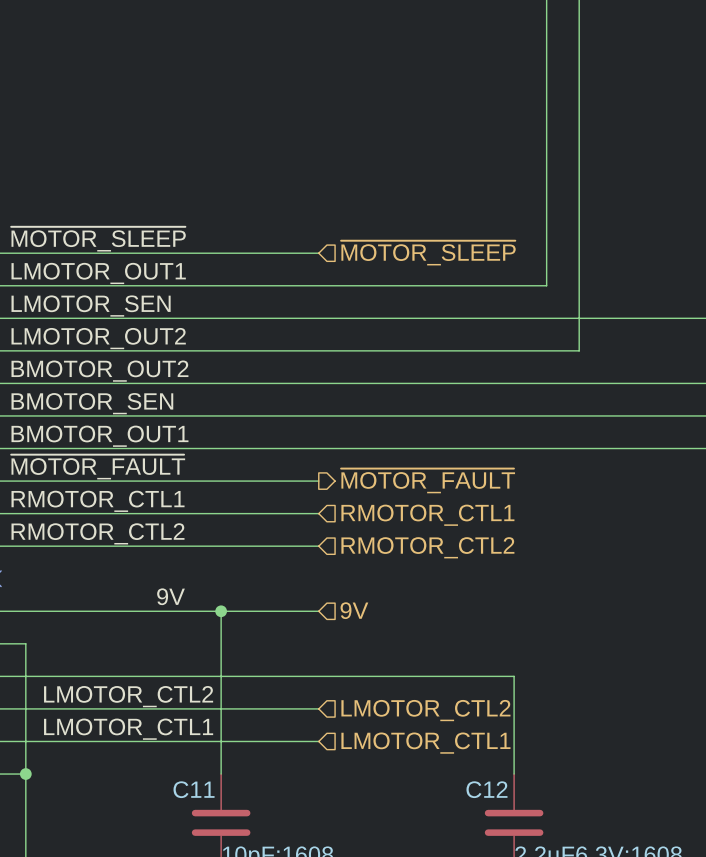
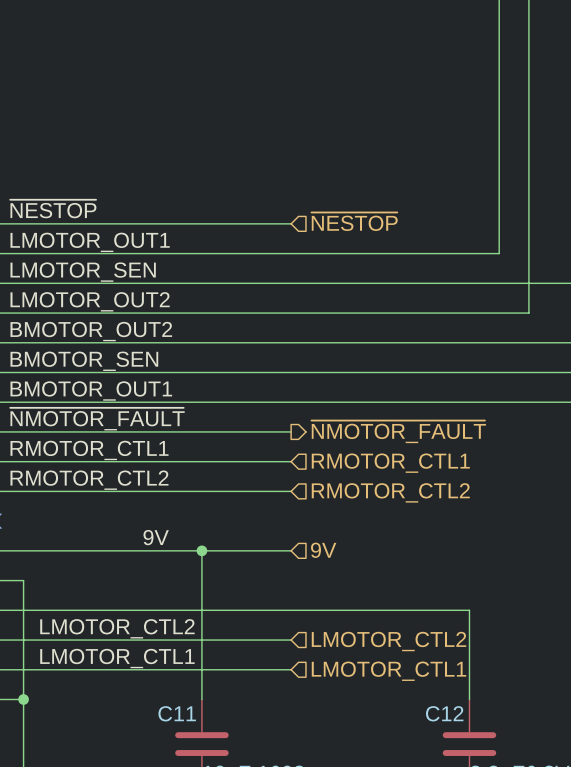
label: ~{MOTOR_SLEEP} (98, 239) -> ~{NESTOP} (53, 209)
hierarchical label: ~{MOTOR_SLEEP} (428, 253) -> ~{NESTOP} (354, 221)
label: ~{MOTOR_FAULT} (98, 467) -> ~{NMOTOR_FAULT} (97, 419)
hierarchical label: ~{MOTOR_FAULT} (428, 480) -> ~{NMOTOR_FAULT} (398, 431)

